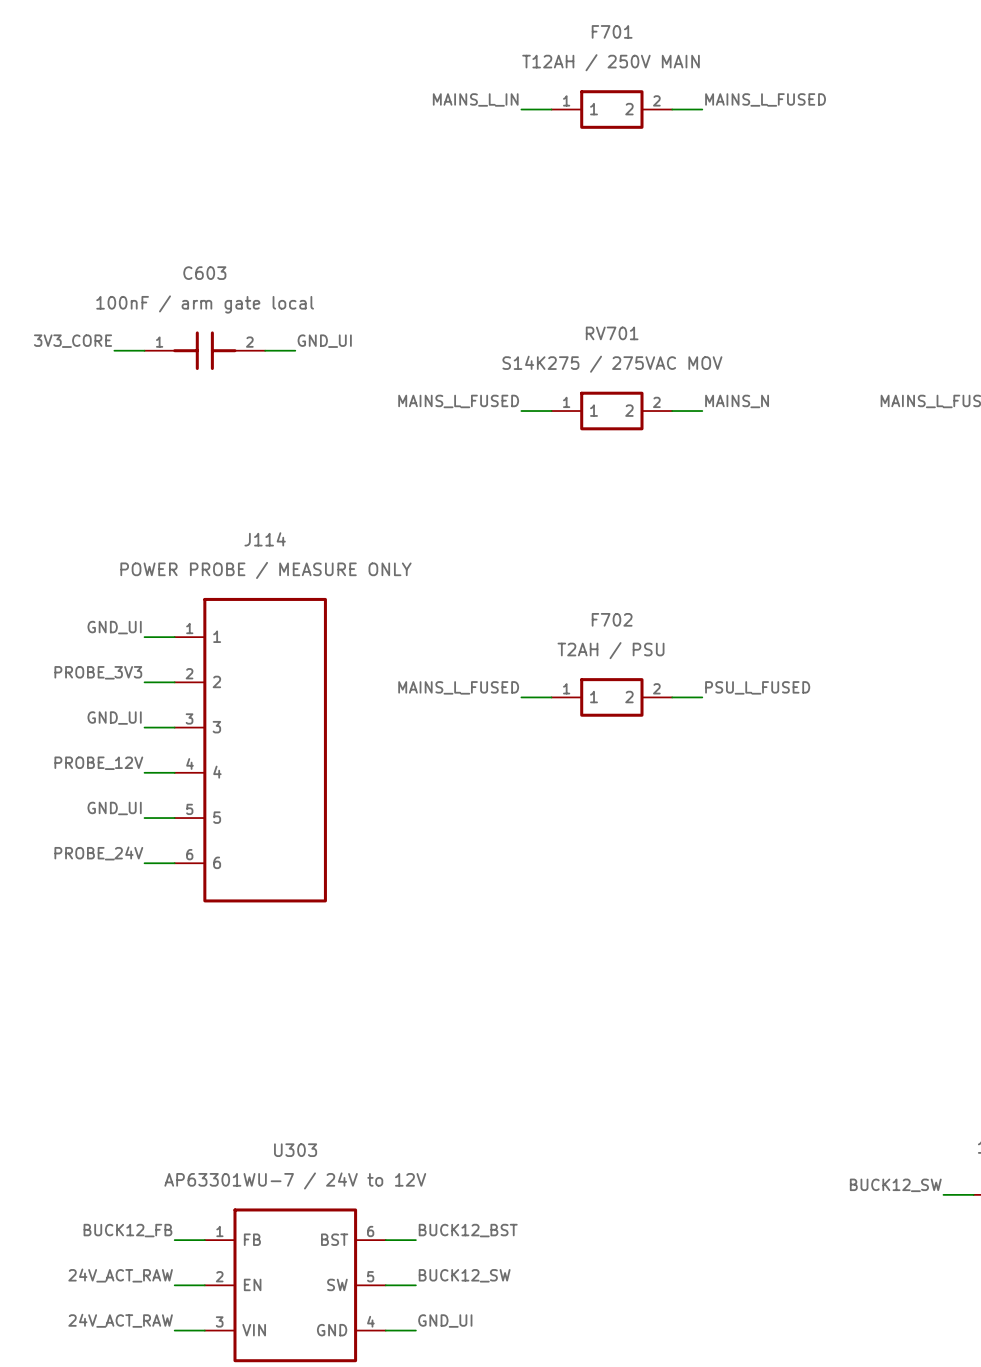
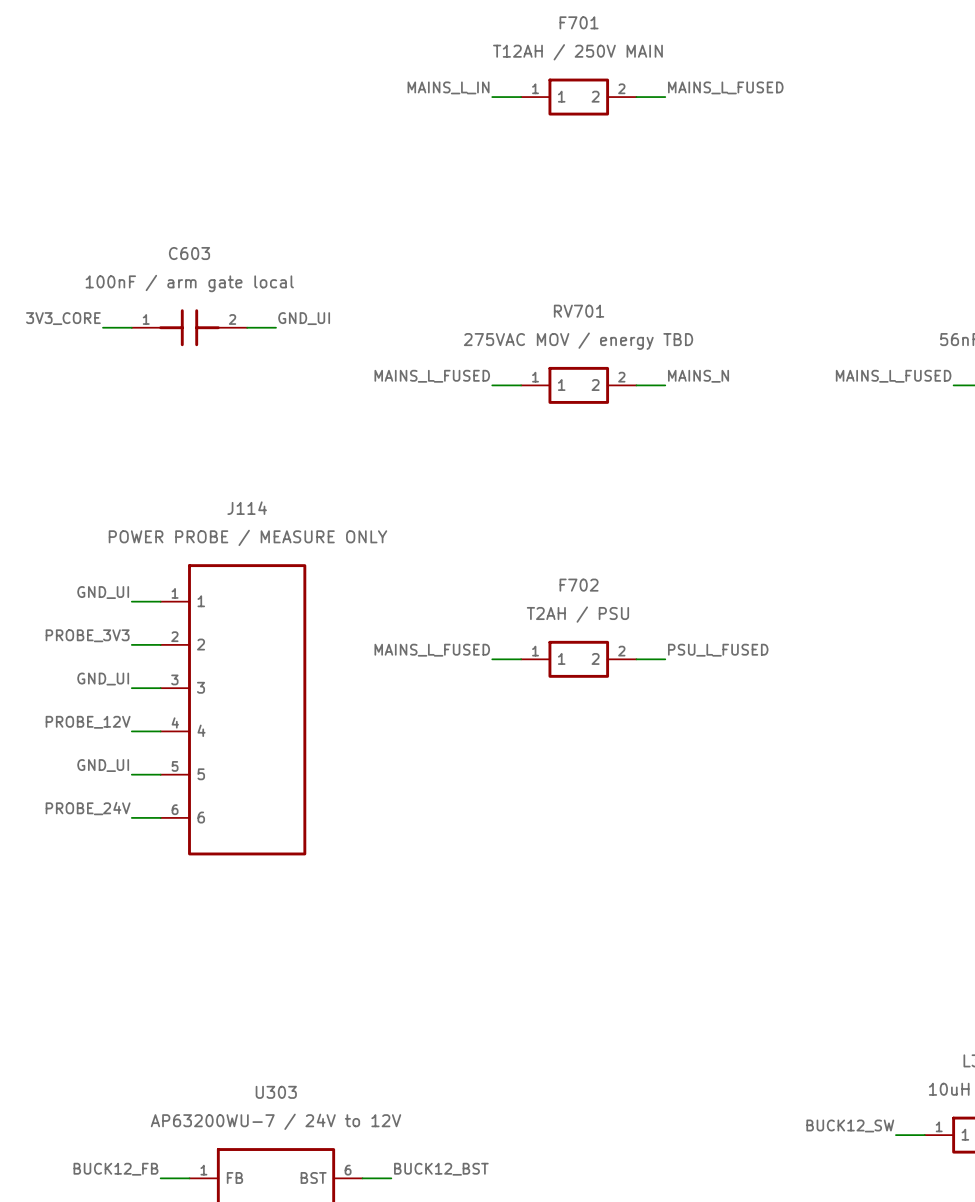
RV701 value: S14K275 / 275VAC MOV (612, 364) -> 275VAC MOV / energy TBD (578, 341)
U303 value: AP63301WU-7 / 24V to 12V (295, 1180) -> AP63200WU-7 / 24V to 12V (276, 1121)

